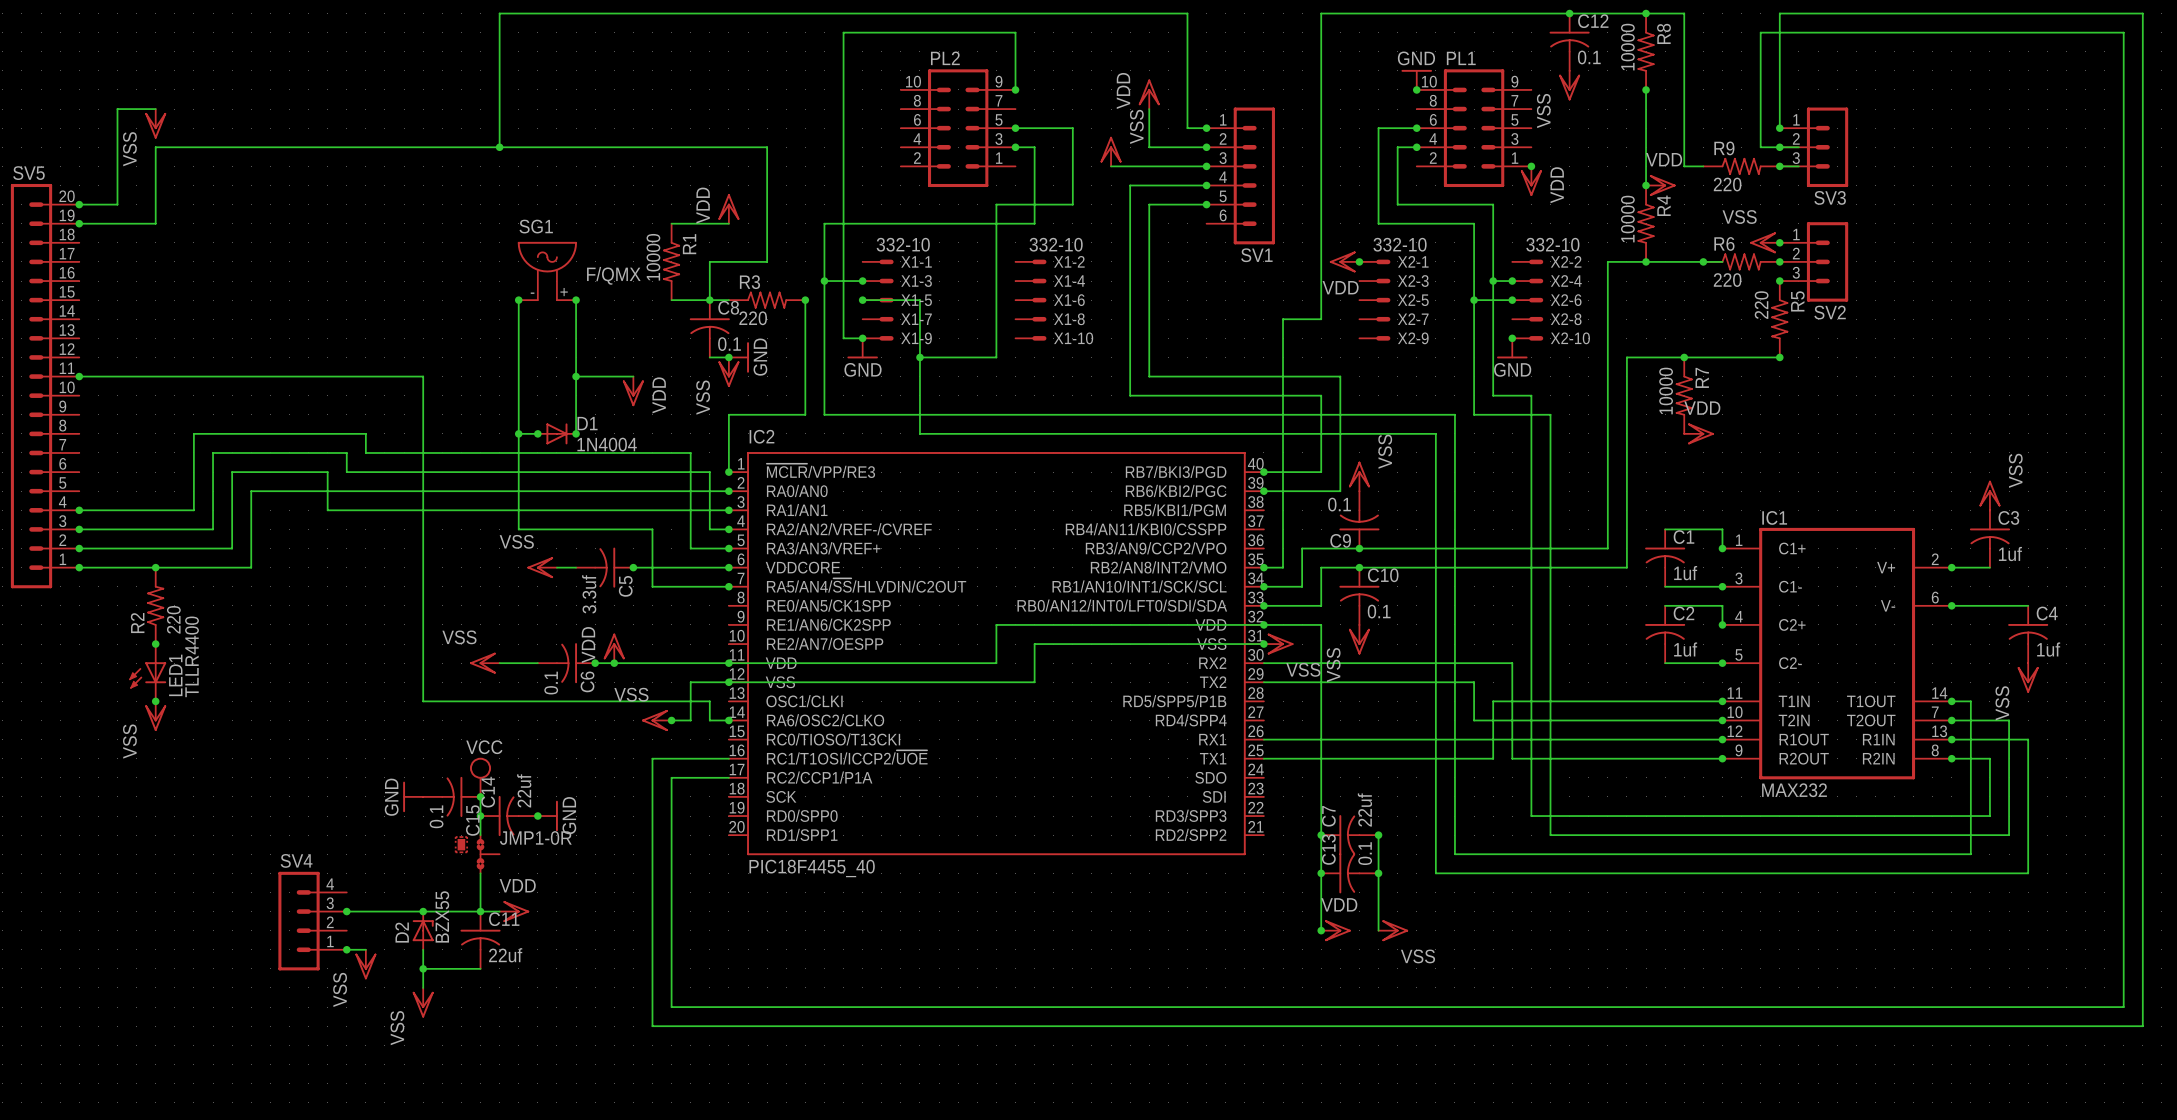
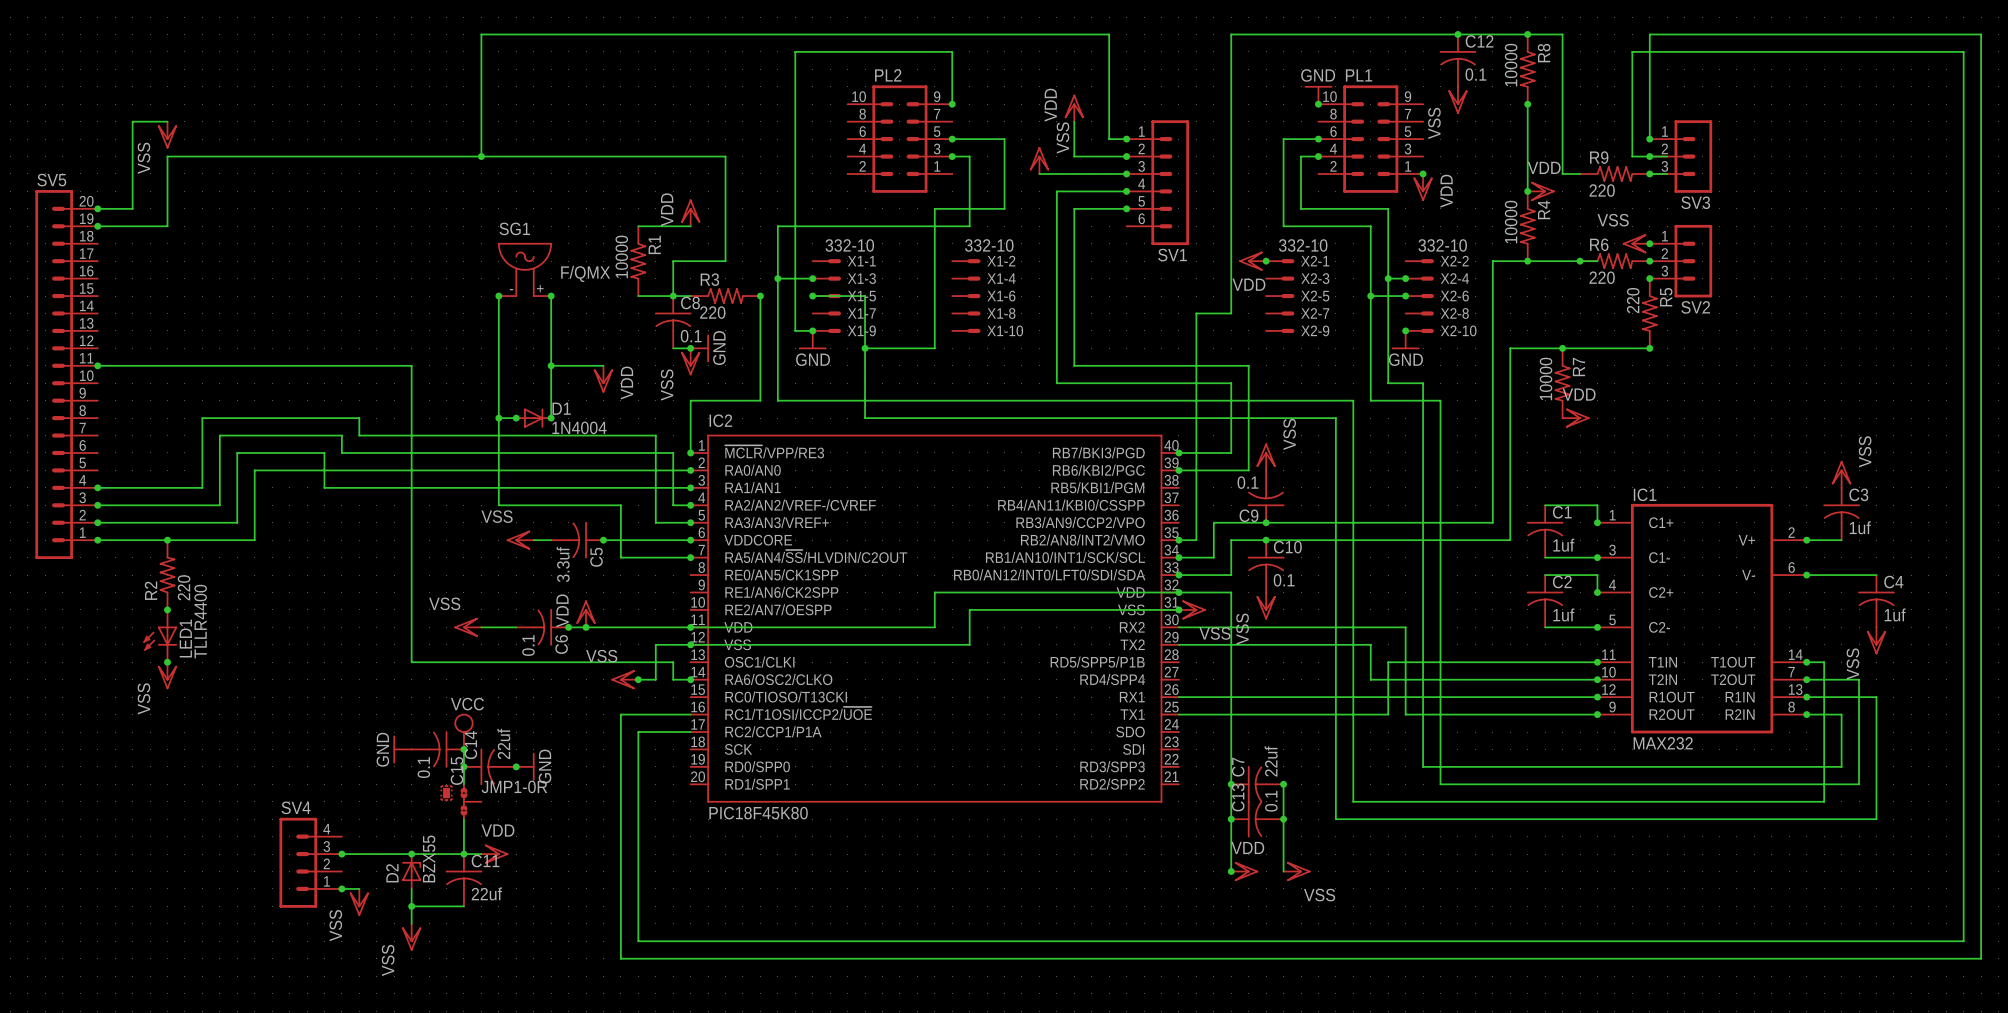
IC2 value: PIC18F4455_40 (812, 868) -> PIC18F45K80 (758, 813)

